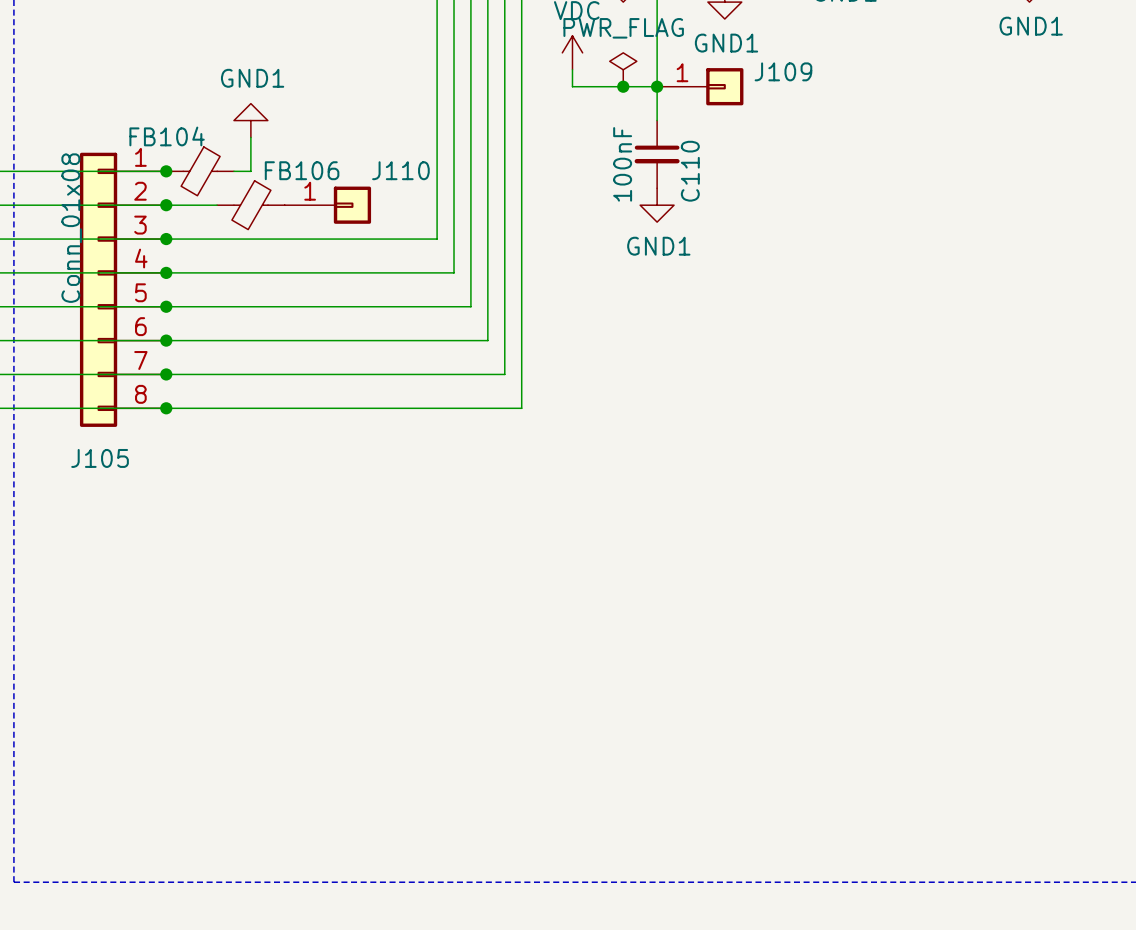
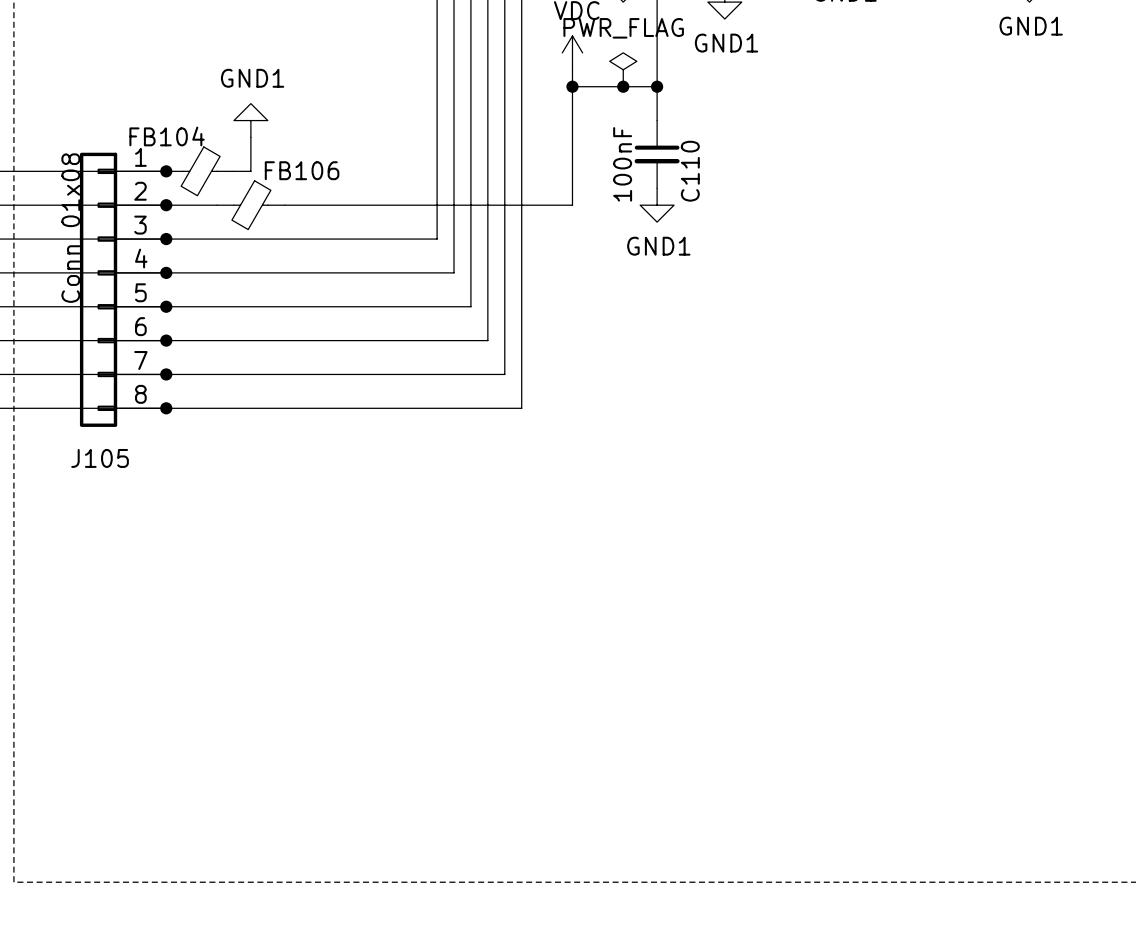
wire: none -> (572, 86) (572, 205) (284, 205)
junction: none -> (572, 86)
J109: (700, 86) -> none
J110: (327, 205) -> none

